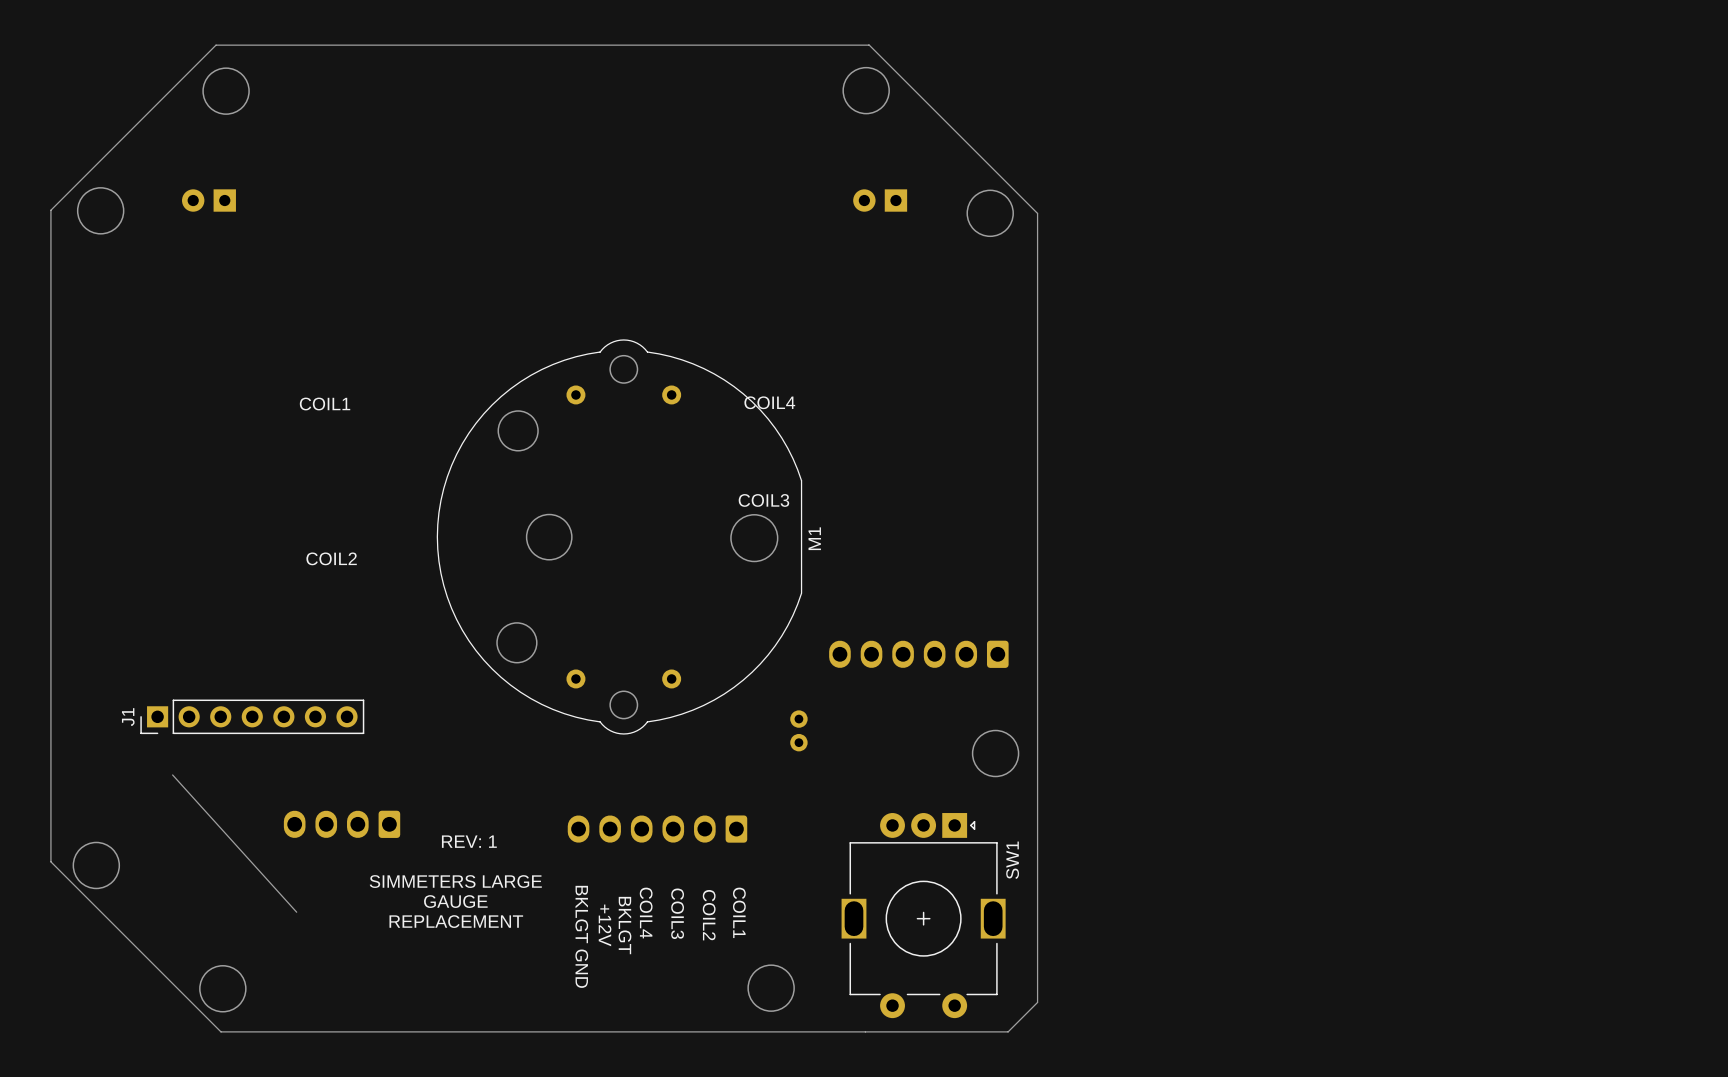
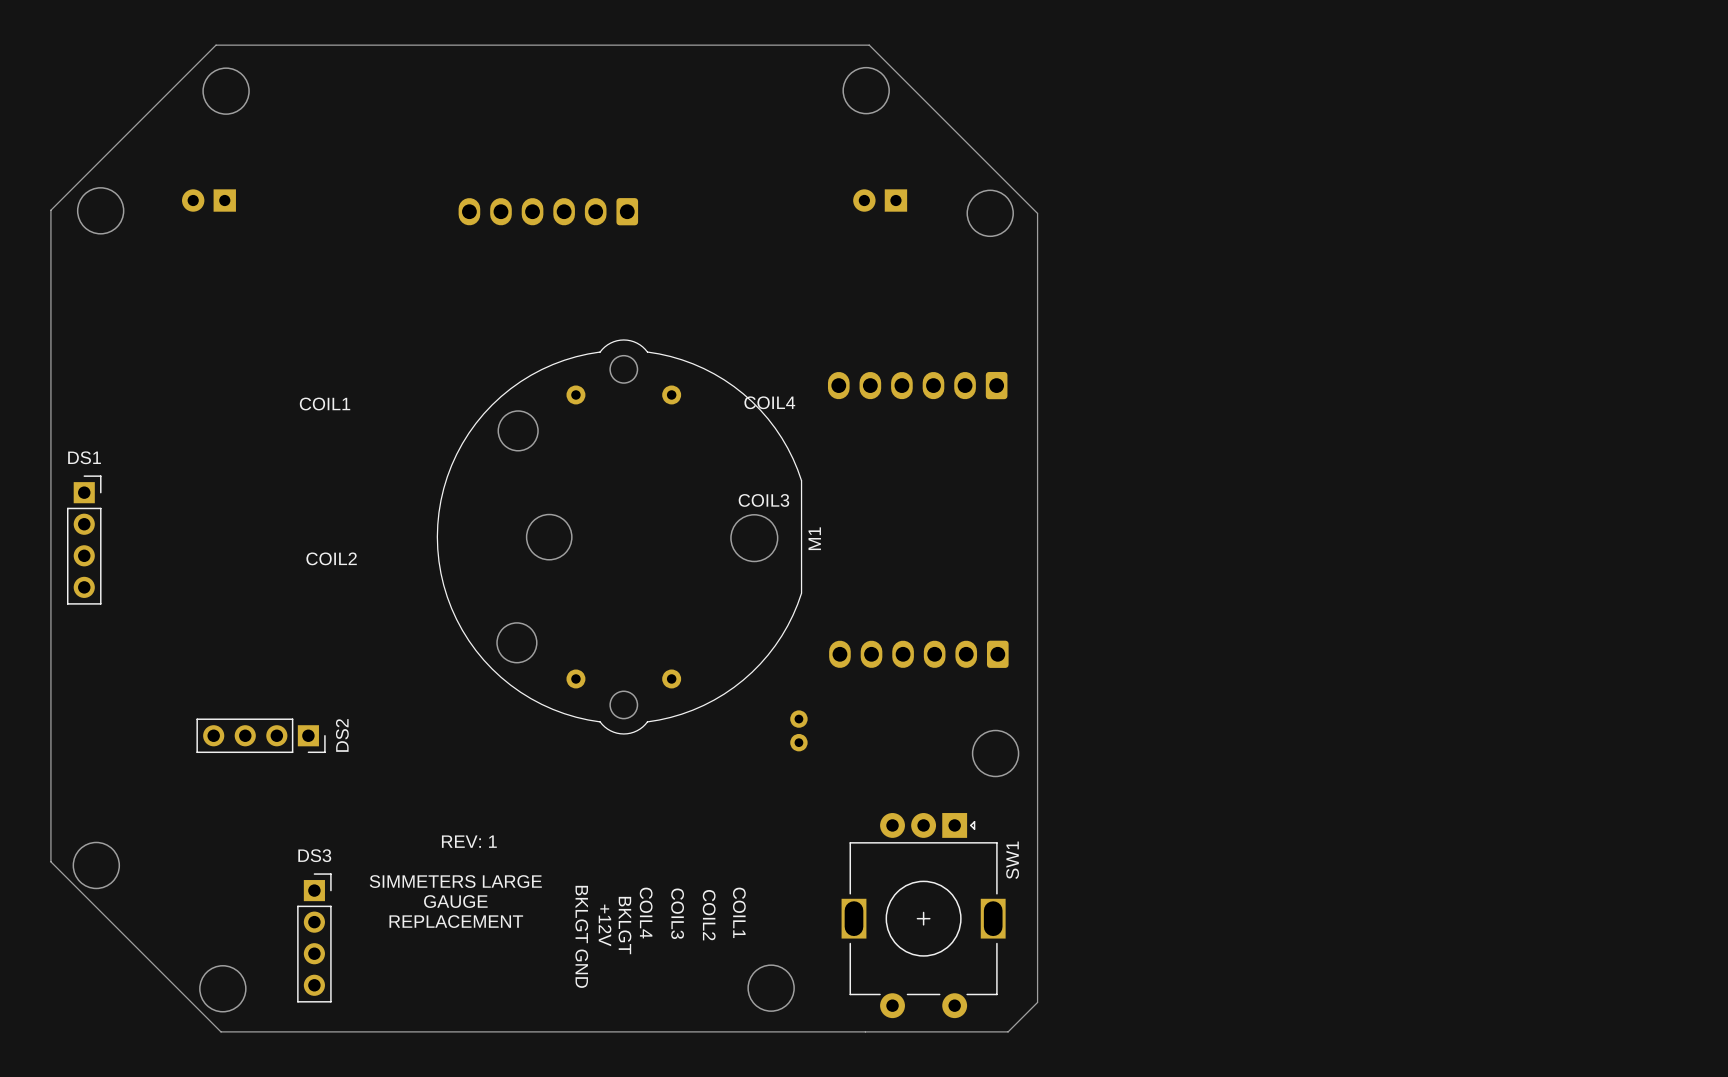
part: none -> (548, 211)
part: none -> (917, 385)
DS1: none -> (84, 540)
J1: (252, 716) -> none
DS2: none -> (261, 735)
board edge: (172, 774) (296, 912) -> none
part: (342, 824) -> none
part: (657, 829) -> none
DS3: none -> (314, 937)

